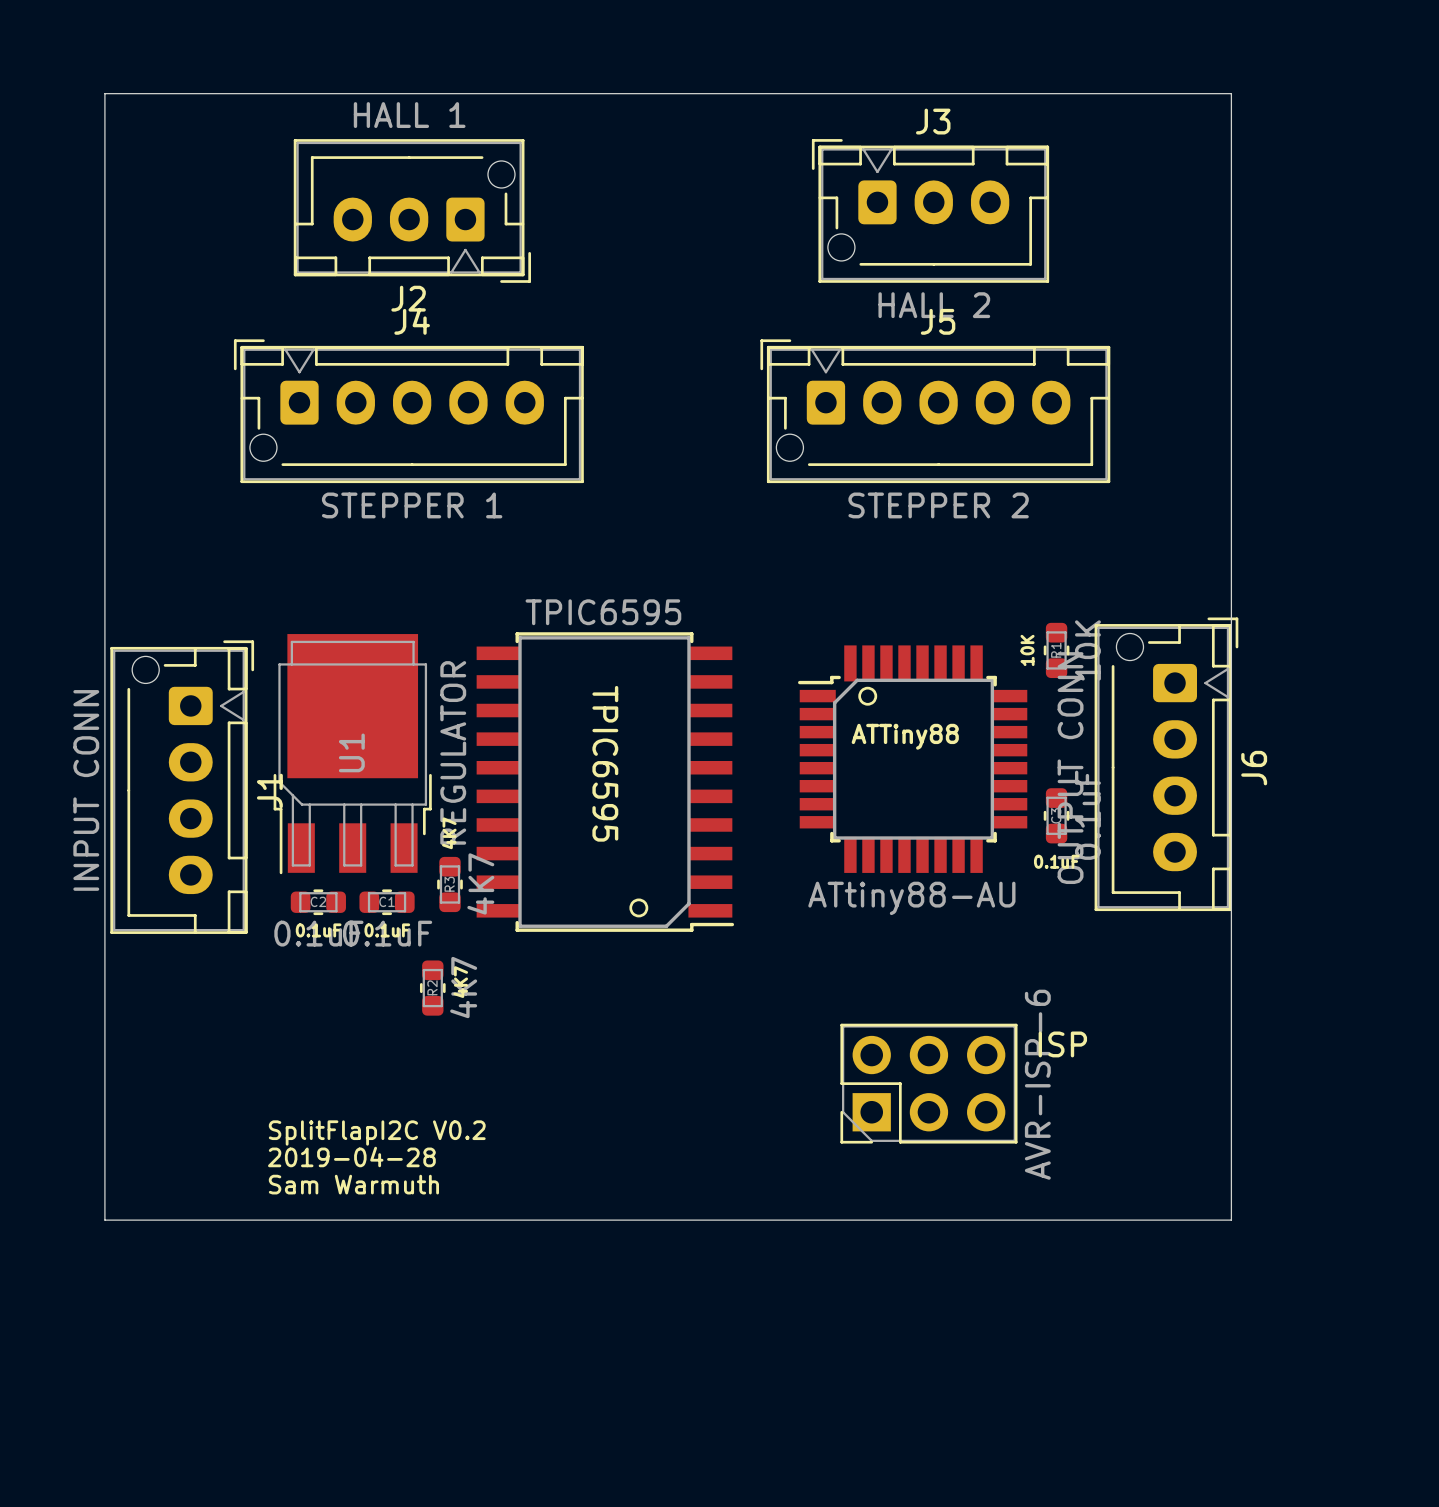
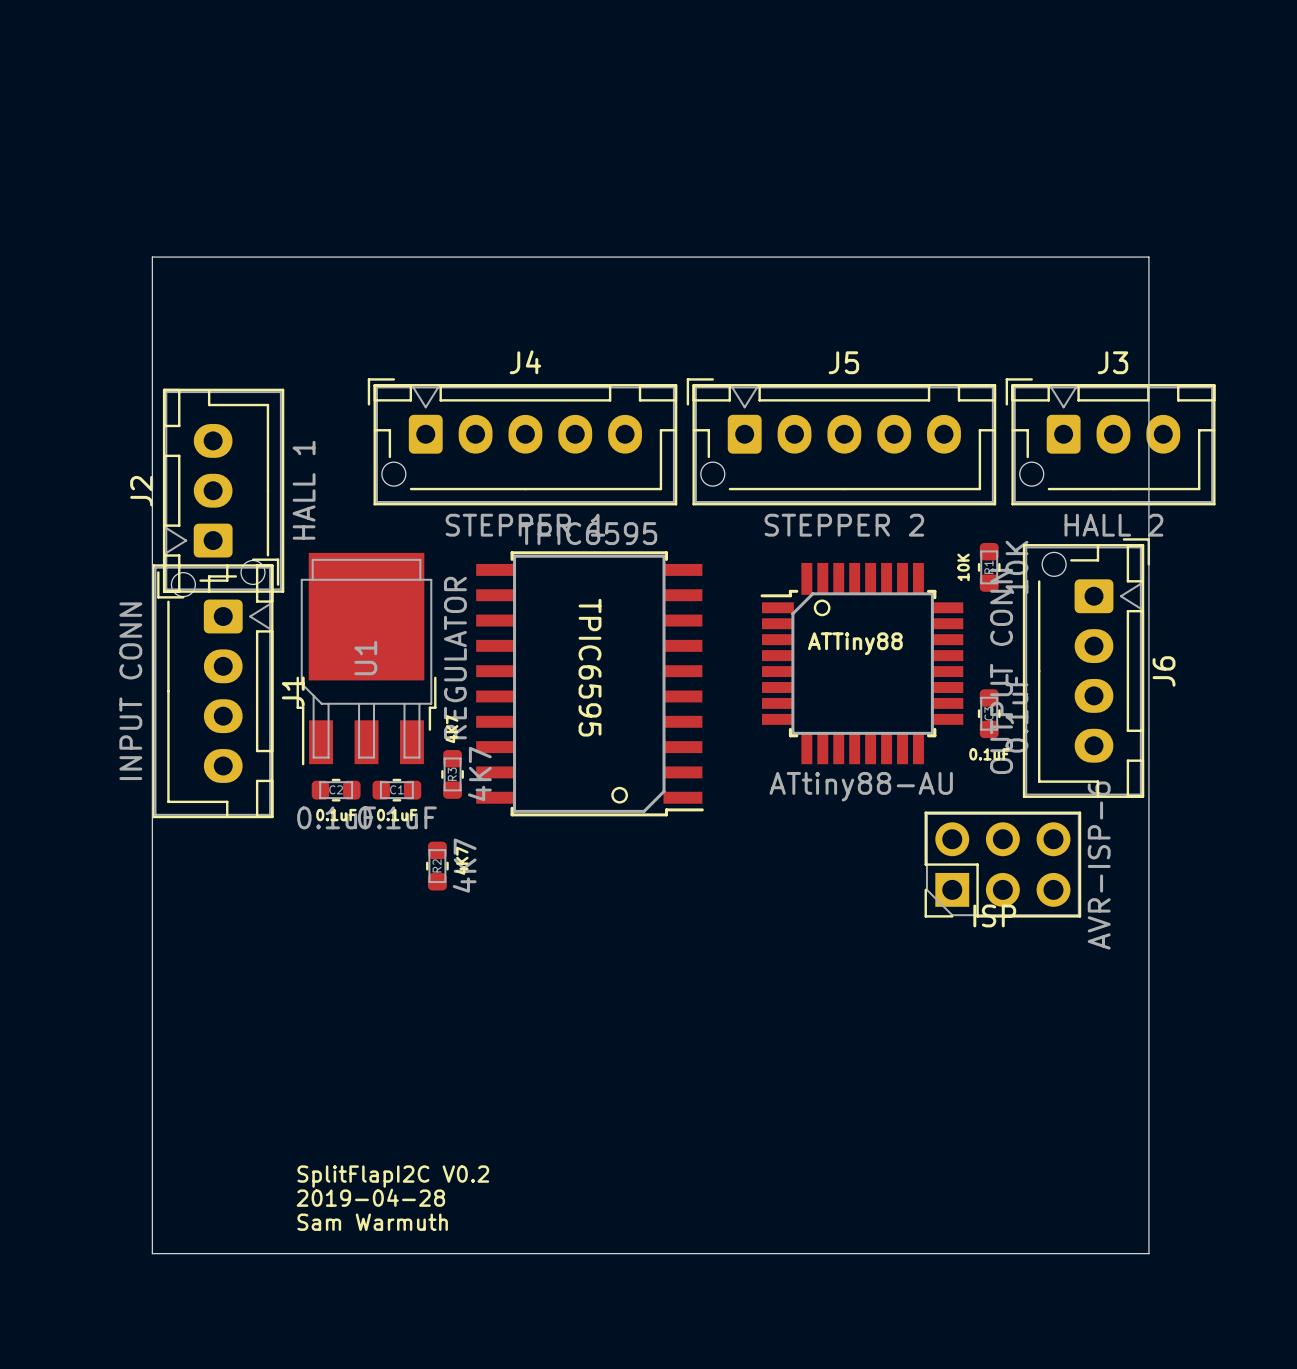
board edge: (104, 93) (1231, 93) (1231, 1220) (104, 1220) (104, 93) -> (152, 257) (152, 1253) (1148, 1253) (1148, 257) (152, 257)
J2 rotation: 0° (412, 210) -> 90° clockwise (220, 493)
J2 position: (412, 210) -> (220, 493)
J3 position: (930, 210) -> (1110, 441)
J4 position: (408, 411) -> (522, 441)
J5 position: (935, 411) -> (841, 441)
part position: (928, 1083) -> (1002, 864)
text position: SplitFlapI2C V0.2 (377, 1133) -> SplitFlapI2C V0.2 (393, 1176)
text position: 2019-04-28 (351, 1156) -> 2019-04-28 (370, 1197)
text position: Sam Warmuth (353, 1184) -> Sam Warmuth (372, 1222)

